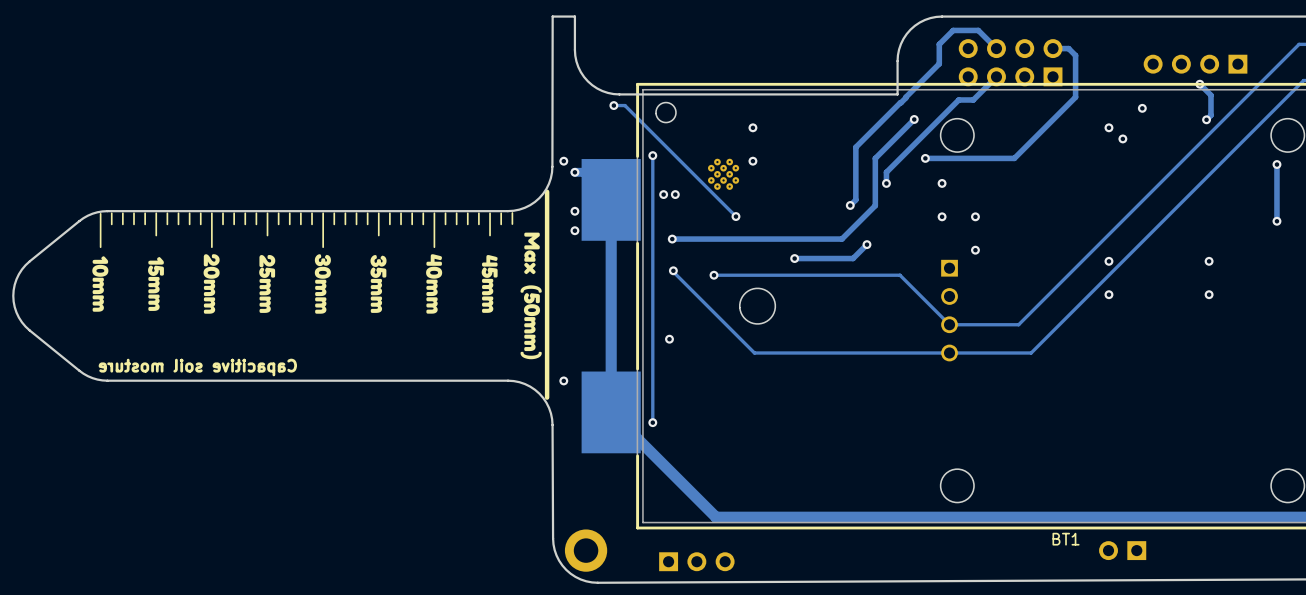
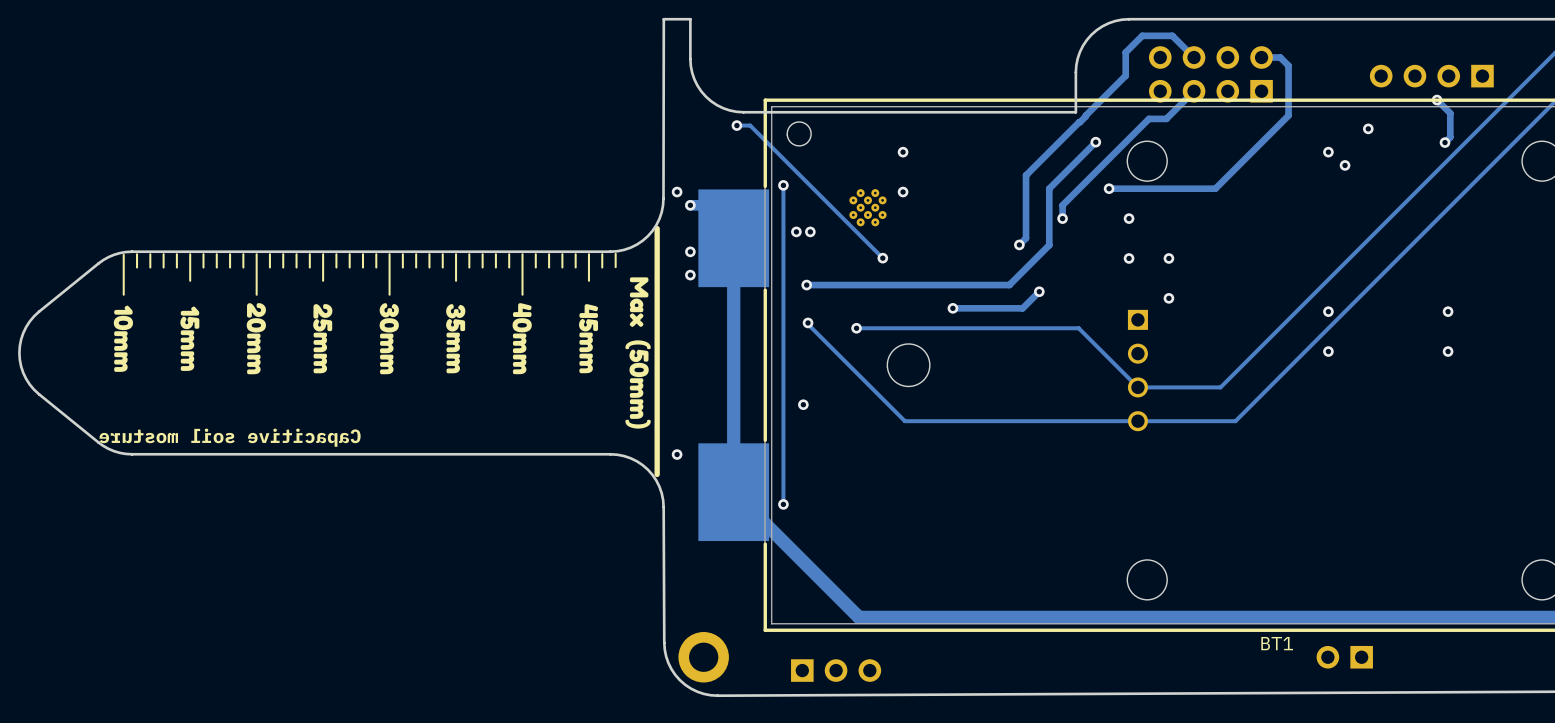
track: (1276, 164) (1276, 221) -> none
via: (1276, 164) -> none
via: (1276, 221) -> none

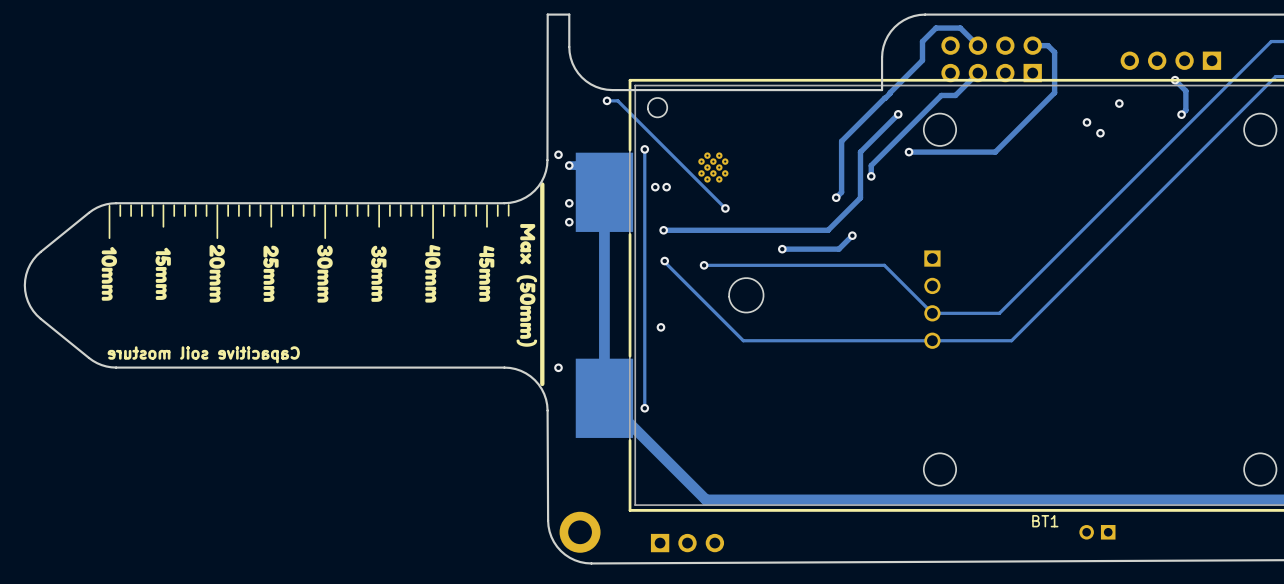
via: (903, 152) -> none
via: (903, 192) -> none
via: (1129, 218) -> none
via: (1129, 258) -> none
via: (1168, 258) -> none
via: (1168, 298) -> none
via: (1328, 311) -> none
via: (1448, 311) -> none
via: (1328, 351) -> none
via: (1448, 351) -> none
part footprint: [1316, 645, 1373, 669] -> [1079, 524, 1116, 540]

